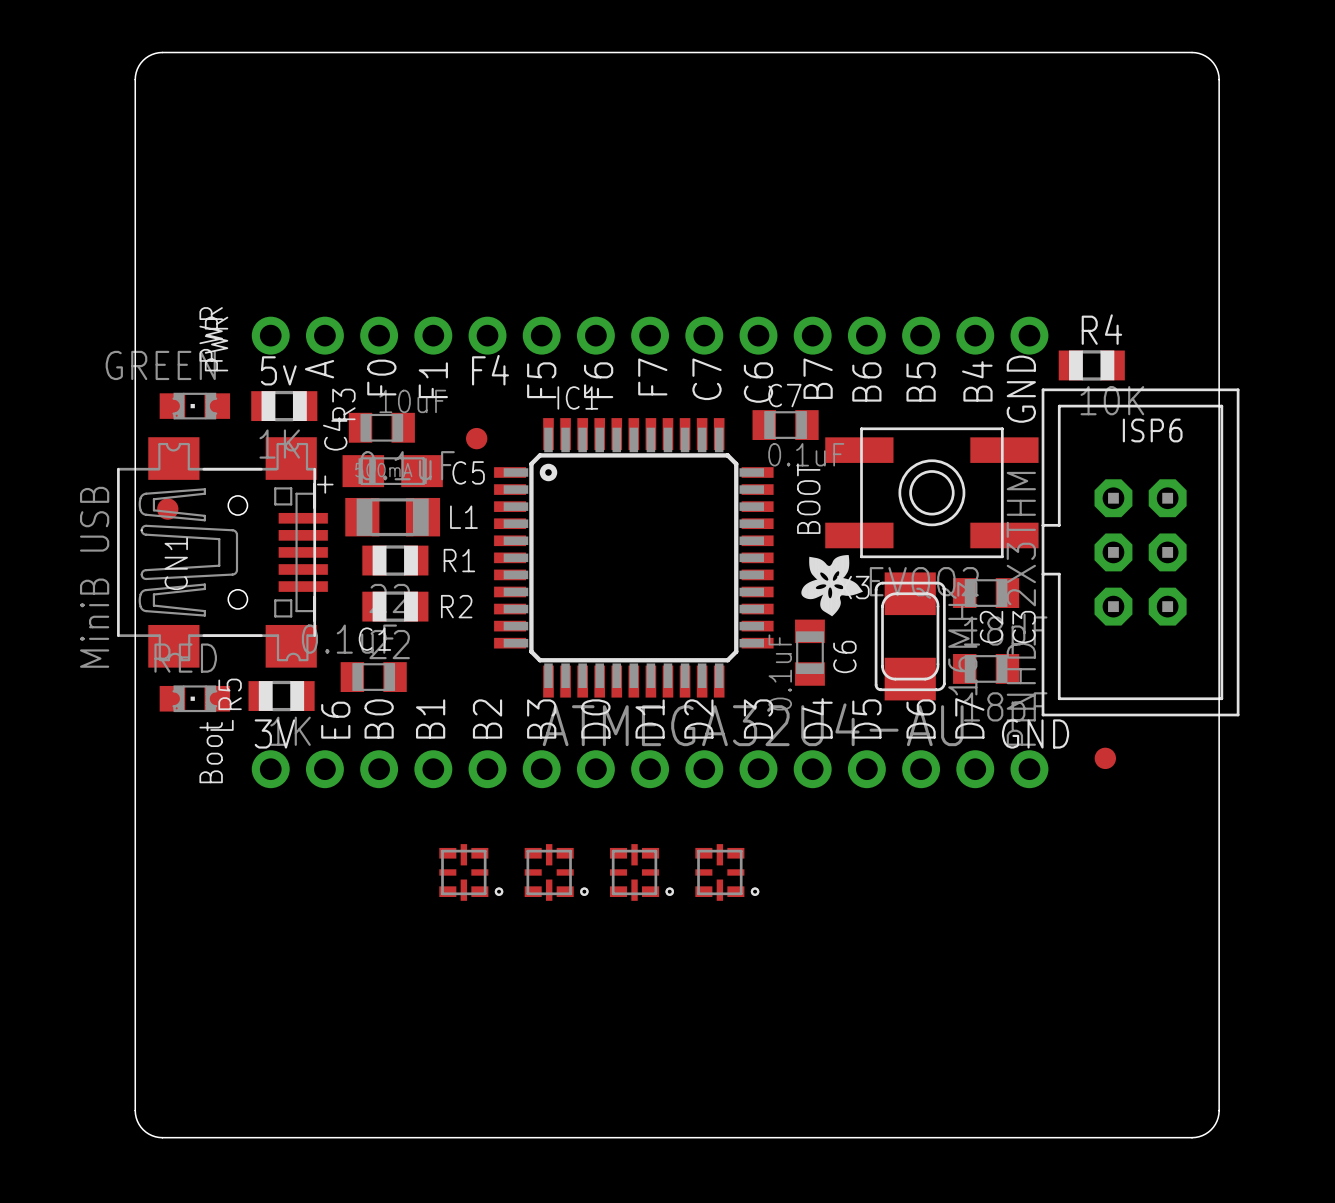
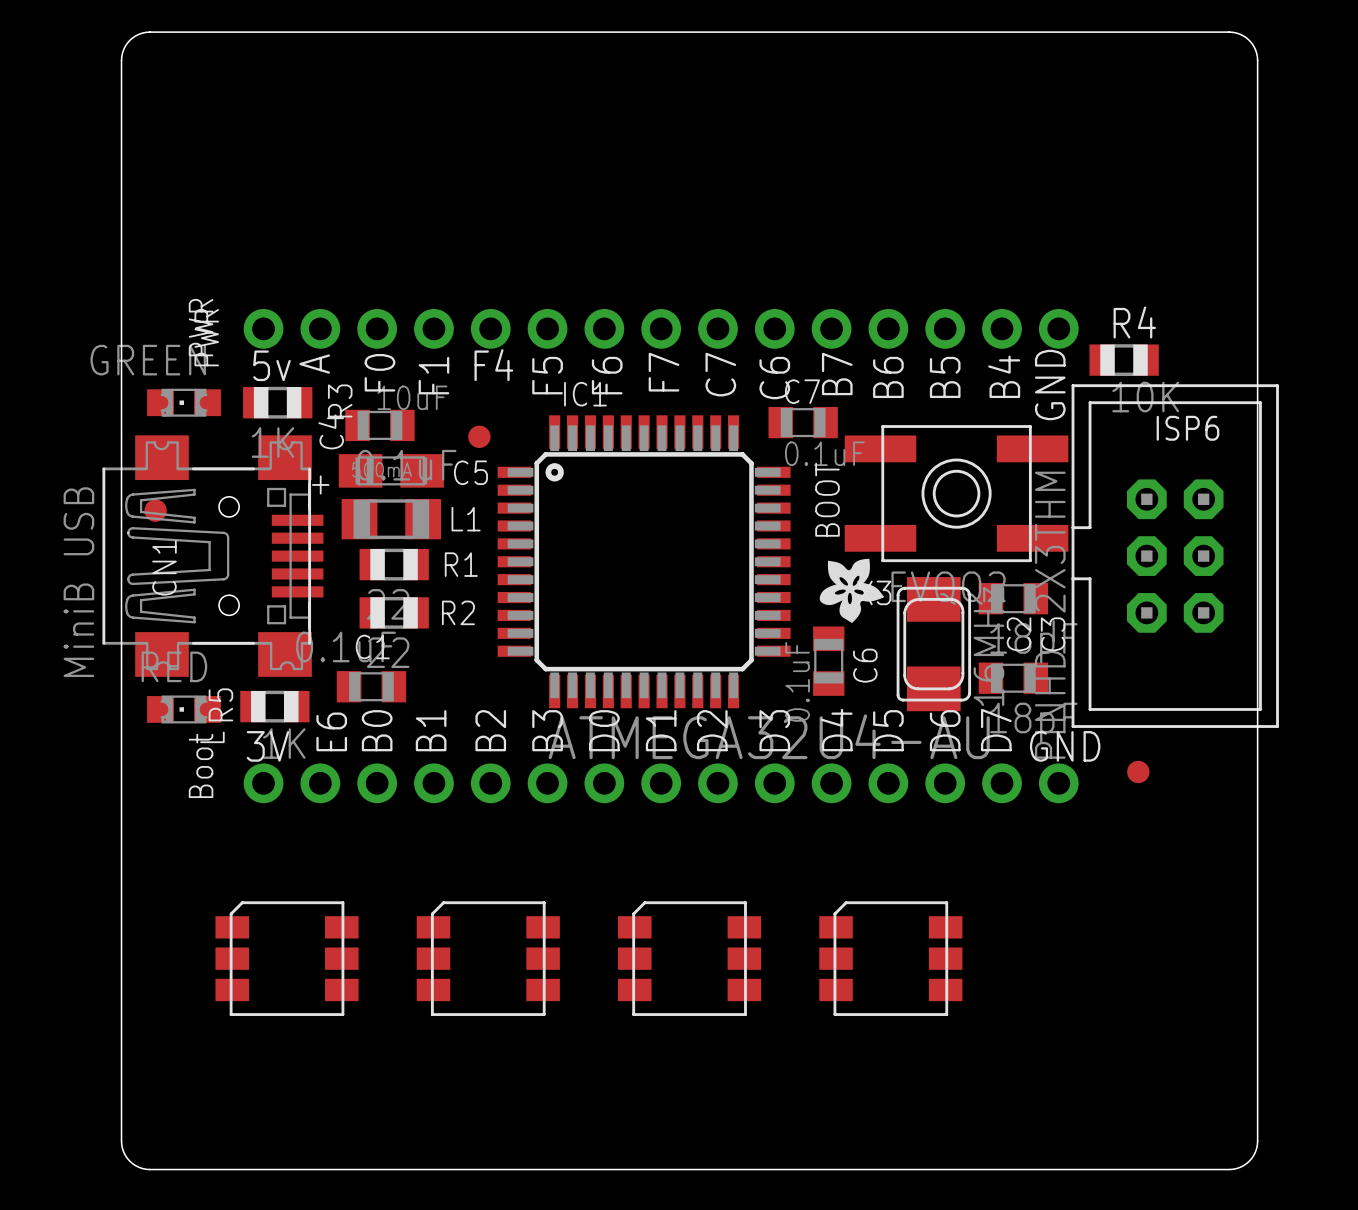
part: (471, 872) -> none
part: (556, 872) -> none
part: (641, 872) -> none
part: (727, 872) -> none
part: none -> (287, 958)
part: none -> (488, 958)
part: none -> (689, 958)
part: none -> (890, 958)

